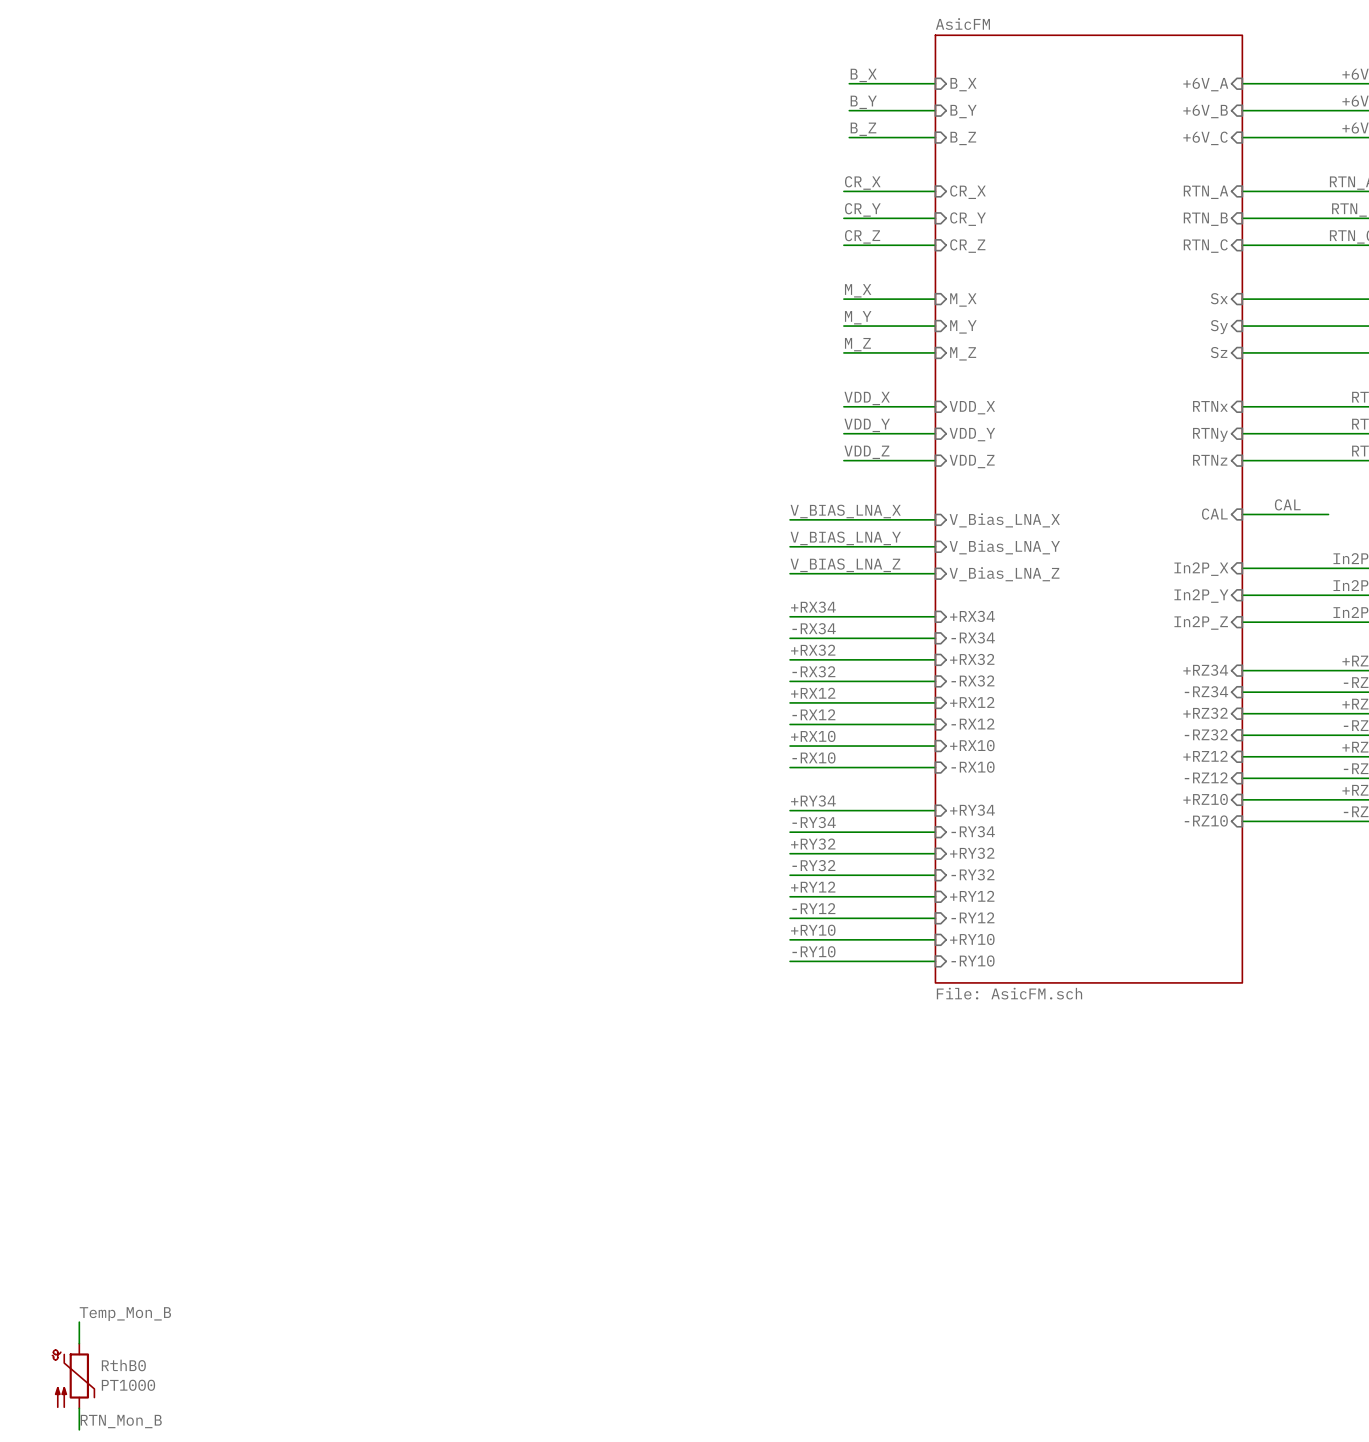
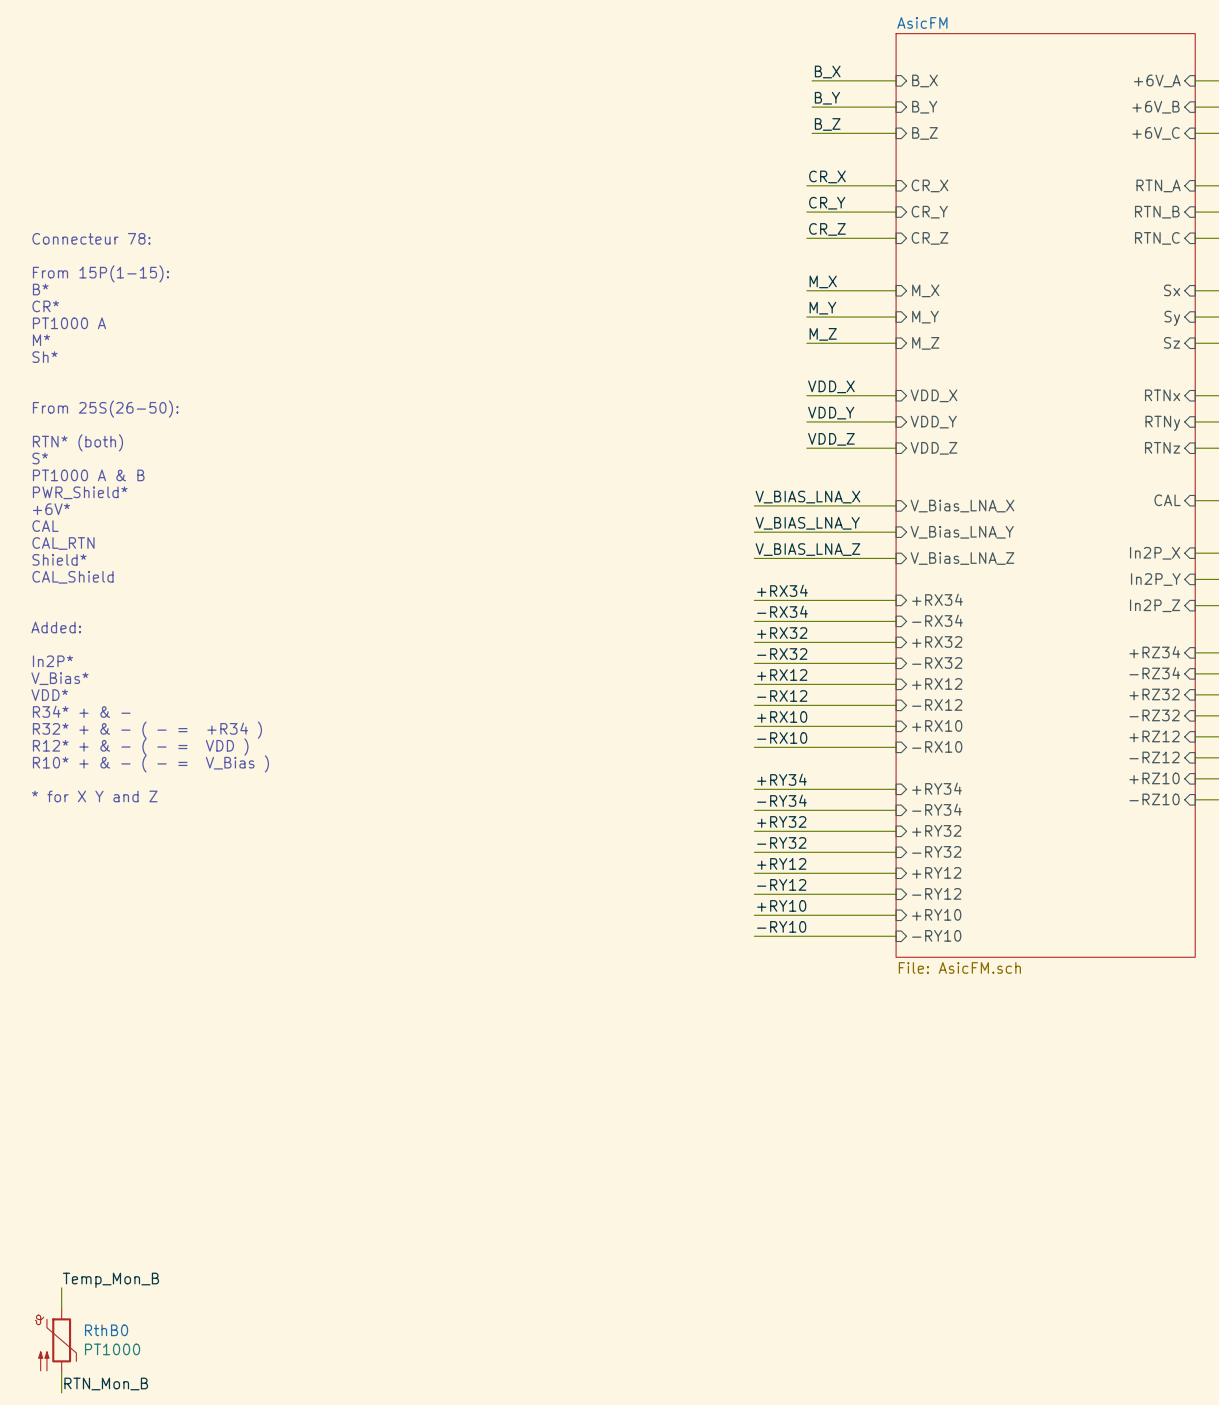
text: none -> Connecteur 78: (91, 238)
text: none -> From 15P(1-15): (100, 273)
text: none -> B* (40, 289)
text: none -> CR* (45, 306)
text: none -> PT1000 A (69, 323)
text: none -> M* (41, 340)
text: none -> Sh* (44, 357)
text: none -> From 25S(26-50): (105, 409)
text: none -> RTN* (both) (77, 442)
text: none -> S* (40, 458)
text: none -> PT1000 A & B (88, 475)
text: none -> PWR_Shield* (80, 492)
text: none -> +6V* (51, 509)
text: none -> CAL (45, 526)
text: none -> CAL_RTN (63, 543)
text: none -> Shield* (59, 559)
text: none -> CAL_Shield (72, 577)
text: none -> Added: (56, 627)
text: none -> In2P* (52, 661)
text: none -> V_Bias* (59, 678)
text: none -> VDD* (49, 695)
text: none -> R34* + & - (81, 711)
text: none -> R32* + & - ( - = +R34 ) (147, 730)
text: none -> R12* + & - ( - = VDD ) (140, 747)
text: none -> R10* + & - ( - = V_Bias ) (150, 763)
text: none -> * for X Y and Z (94, 796)

